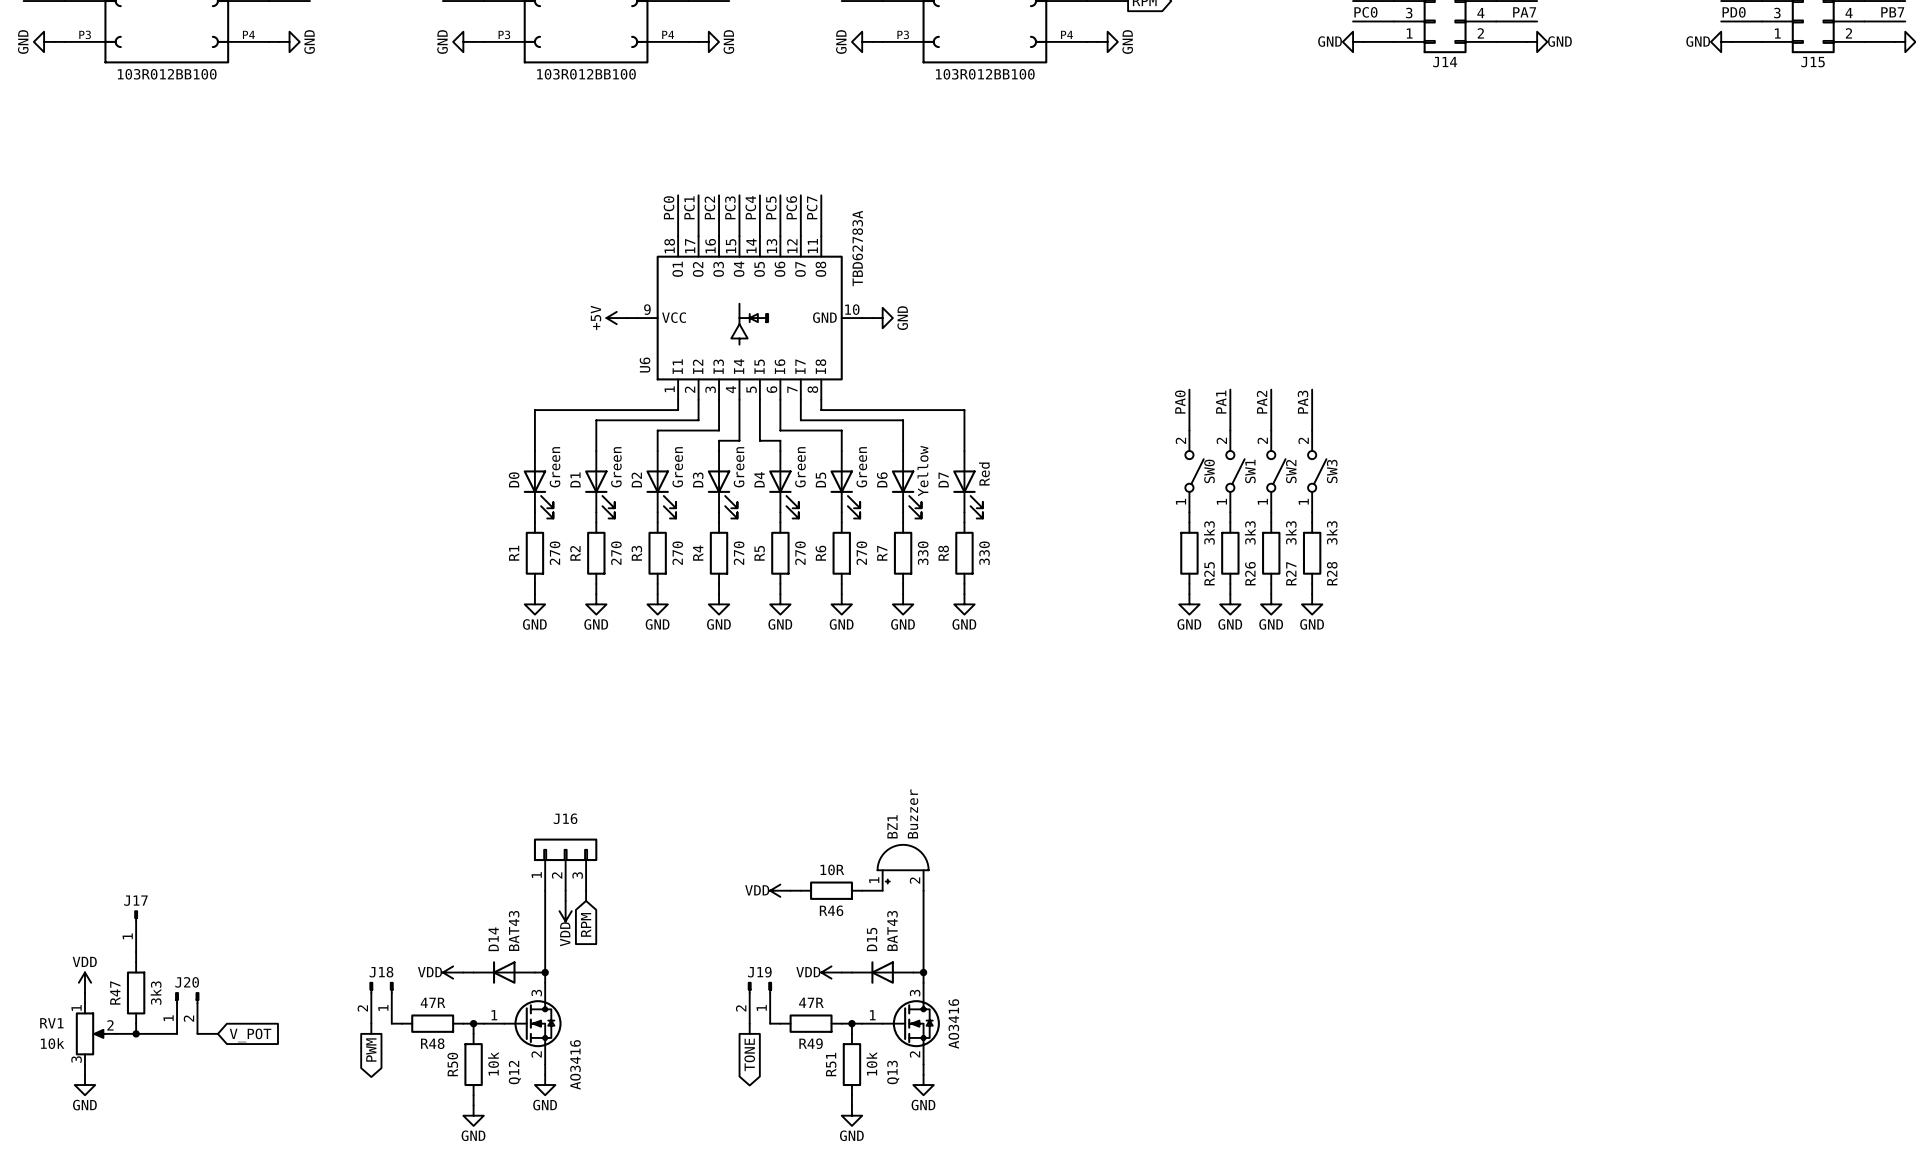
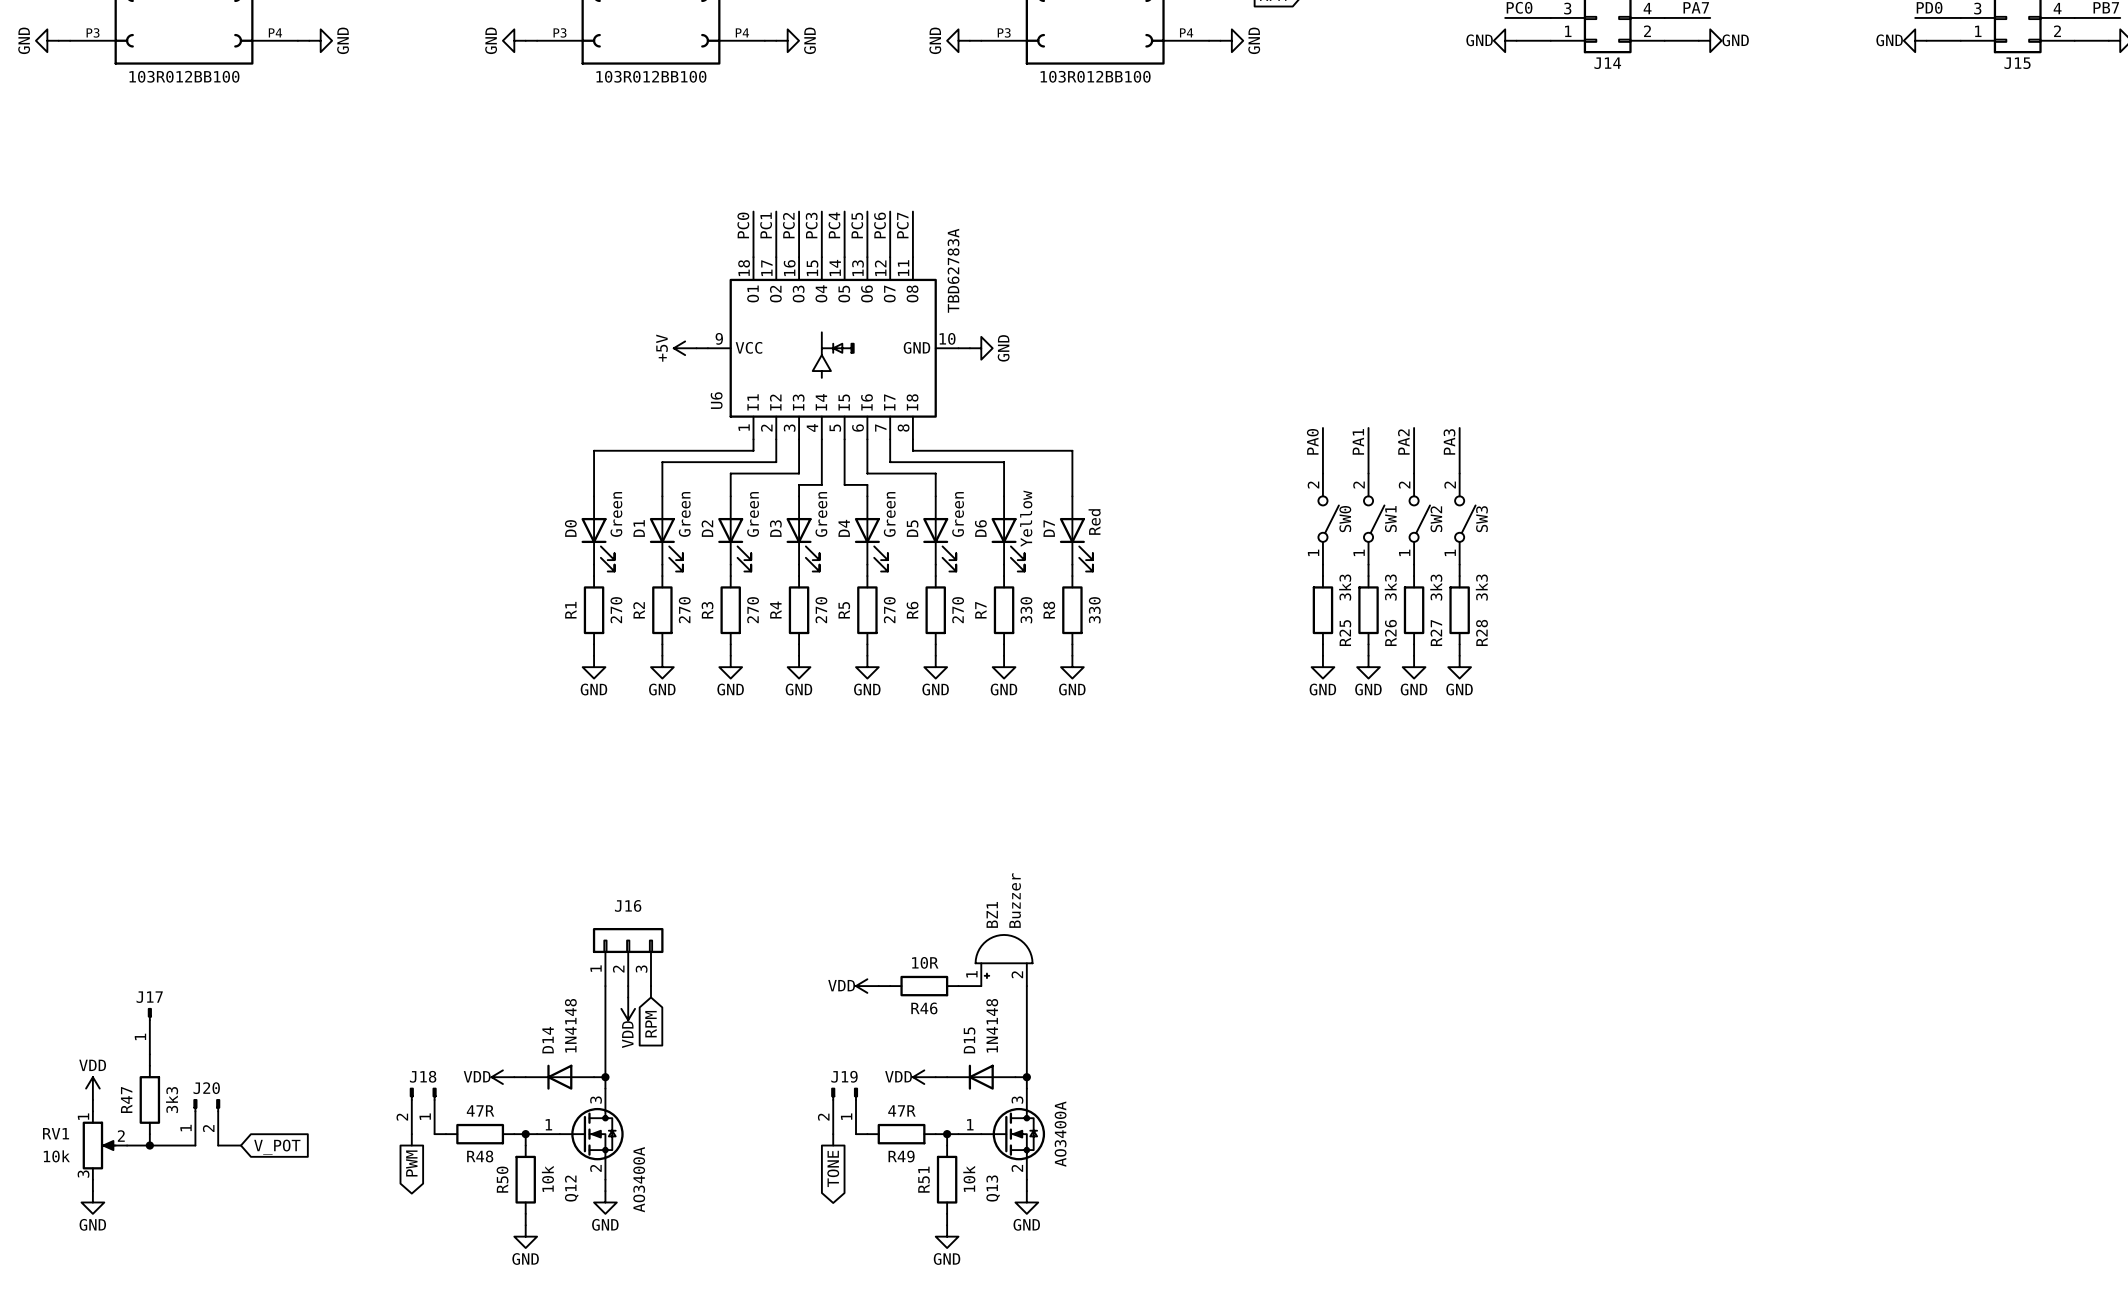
D14 value: BAT43 (514, 930) -> 1N4148 (570, 1025)
D15 value: BAT43 (892, 930) -> 1N4148 (992, 1025)
Q13 value: AO3416 (953, 1023) -> AO3400A (1060, 1134)
Q12 value: AO3416 (575, 1064) -> AO3400A (639, 1179)

